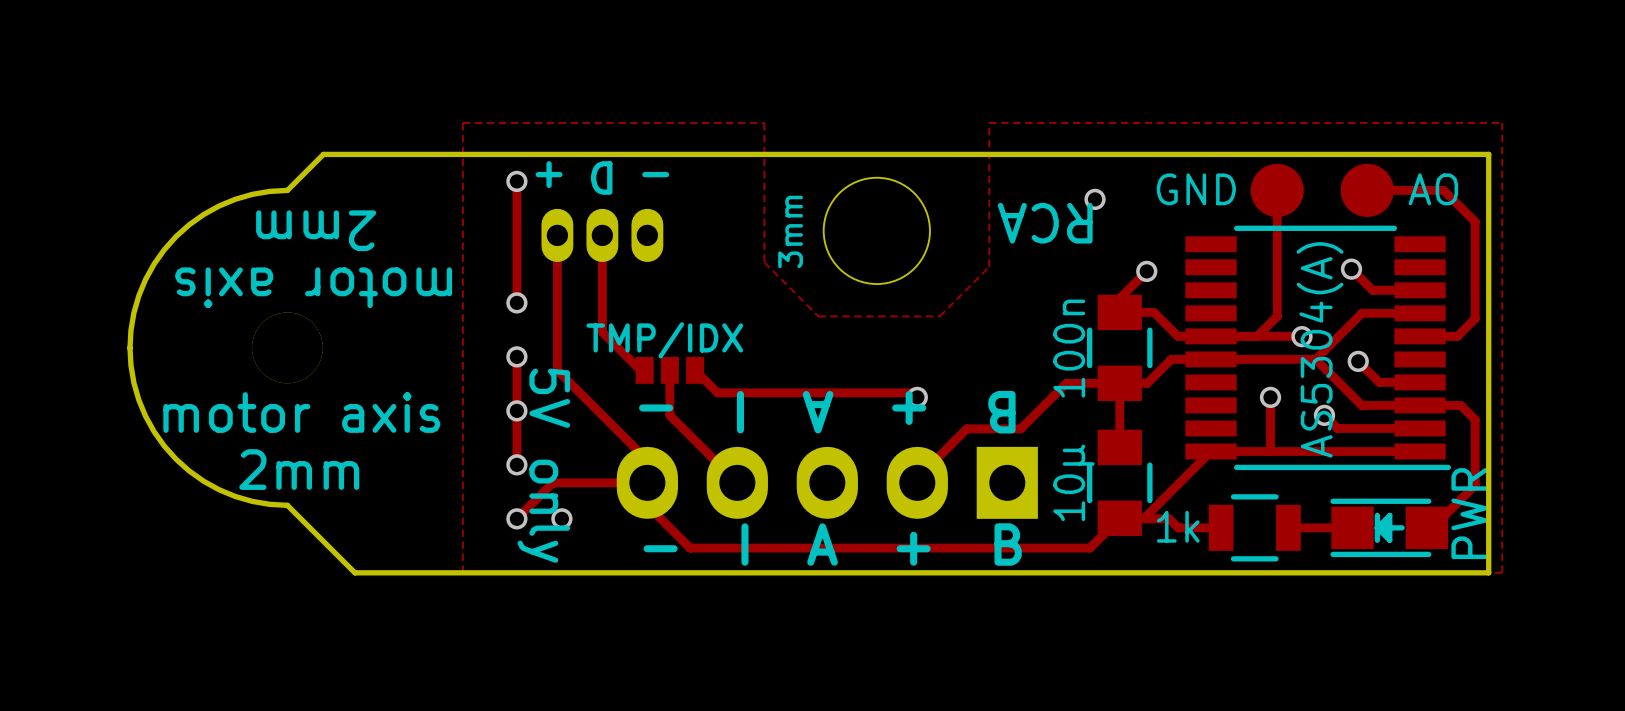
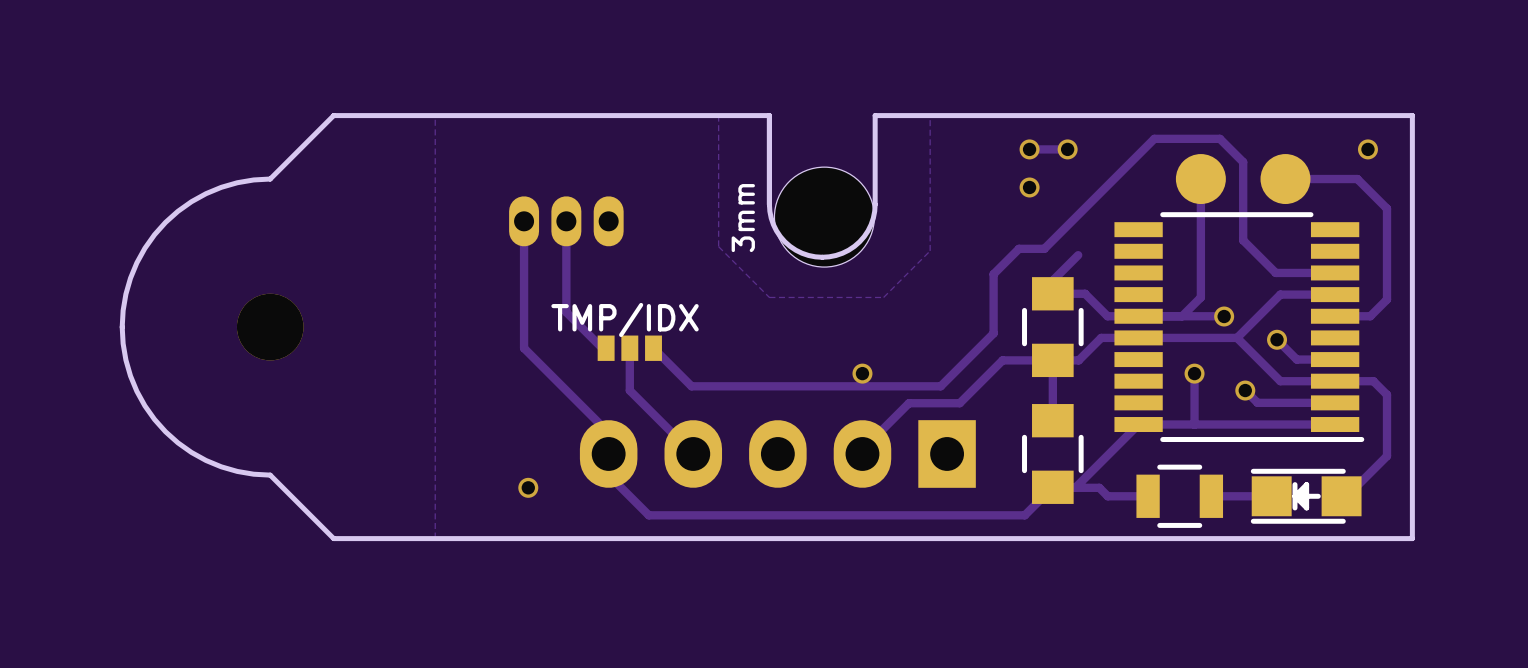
board edge: (323, 154) (1488, 154) (1488, 572) -> (304, 145) (333, 115) (769, 115) (769, 204) (773, 224) (780, 236) (790, 246) (808, 255) (822, 257) (835, 255) (848, 250) (859, 241) (871, 224) (875, 204) (875, 115) (1412, 115) (1412, 538) (1399, 538)
track: none -> (1029, 149) (1067, 149)
via: none -> (1029, 149)
via: none -> (1067, 149)
via: none -> (1367, 149)
text: - D + (602, 177) -> none
track: (516, 181) (516, 302) -> none
via: (516, 181) -> none
part value: GND (1196, 189) -> none
part value: AO (1433, 189) -> none
text: RCA (1045, 223) -> none
text: 2mm (316, 230) -> none
track: (1351, 269) (1372, 290) -> none
via: (1351, 269) -> none
via: (1146, 271) -> none
text: motor axis (313, 287) -> none
via: (516, 302) -> none
part value: 100n (1069, 348) -> none
part value: AS5304(A) (1320, 349) -> none
track: (516, 356) (516, 464) -> none
via: (516, 356) -> none
track: (717, 392) (912, 392) (917, 397) -> (674, 369) (691, 386) (940, 386) (993, 333) (993, 274) (1018, 248) (1044, 248) (1154, 138) (1219, 138) (1243, 162) (1243, 240) (1275, 272) (1290, 272)
via: (516, 410) -> none
text: motor axis (301, 412) -> none
text: B + A I - (827, 412) -> none
via: (516, 464) -> none
text: 5V only (543, 465) -> none
text: 2mm (299, 469) -> none
track: (647, 482) (552, 482) (516, 518) -> none
part value: 10µ (1073, 482) -> none
part value: PWR (1469, 513) -> none
via: (516, 518) -> none
part value: 1k (1178, 526) -> none
text: - I A + B (832, 544) -> none

